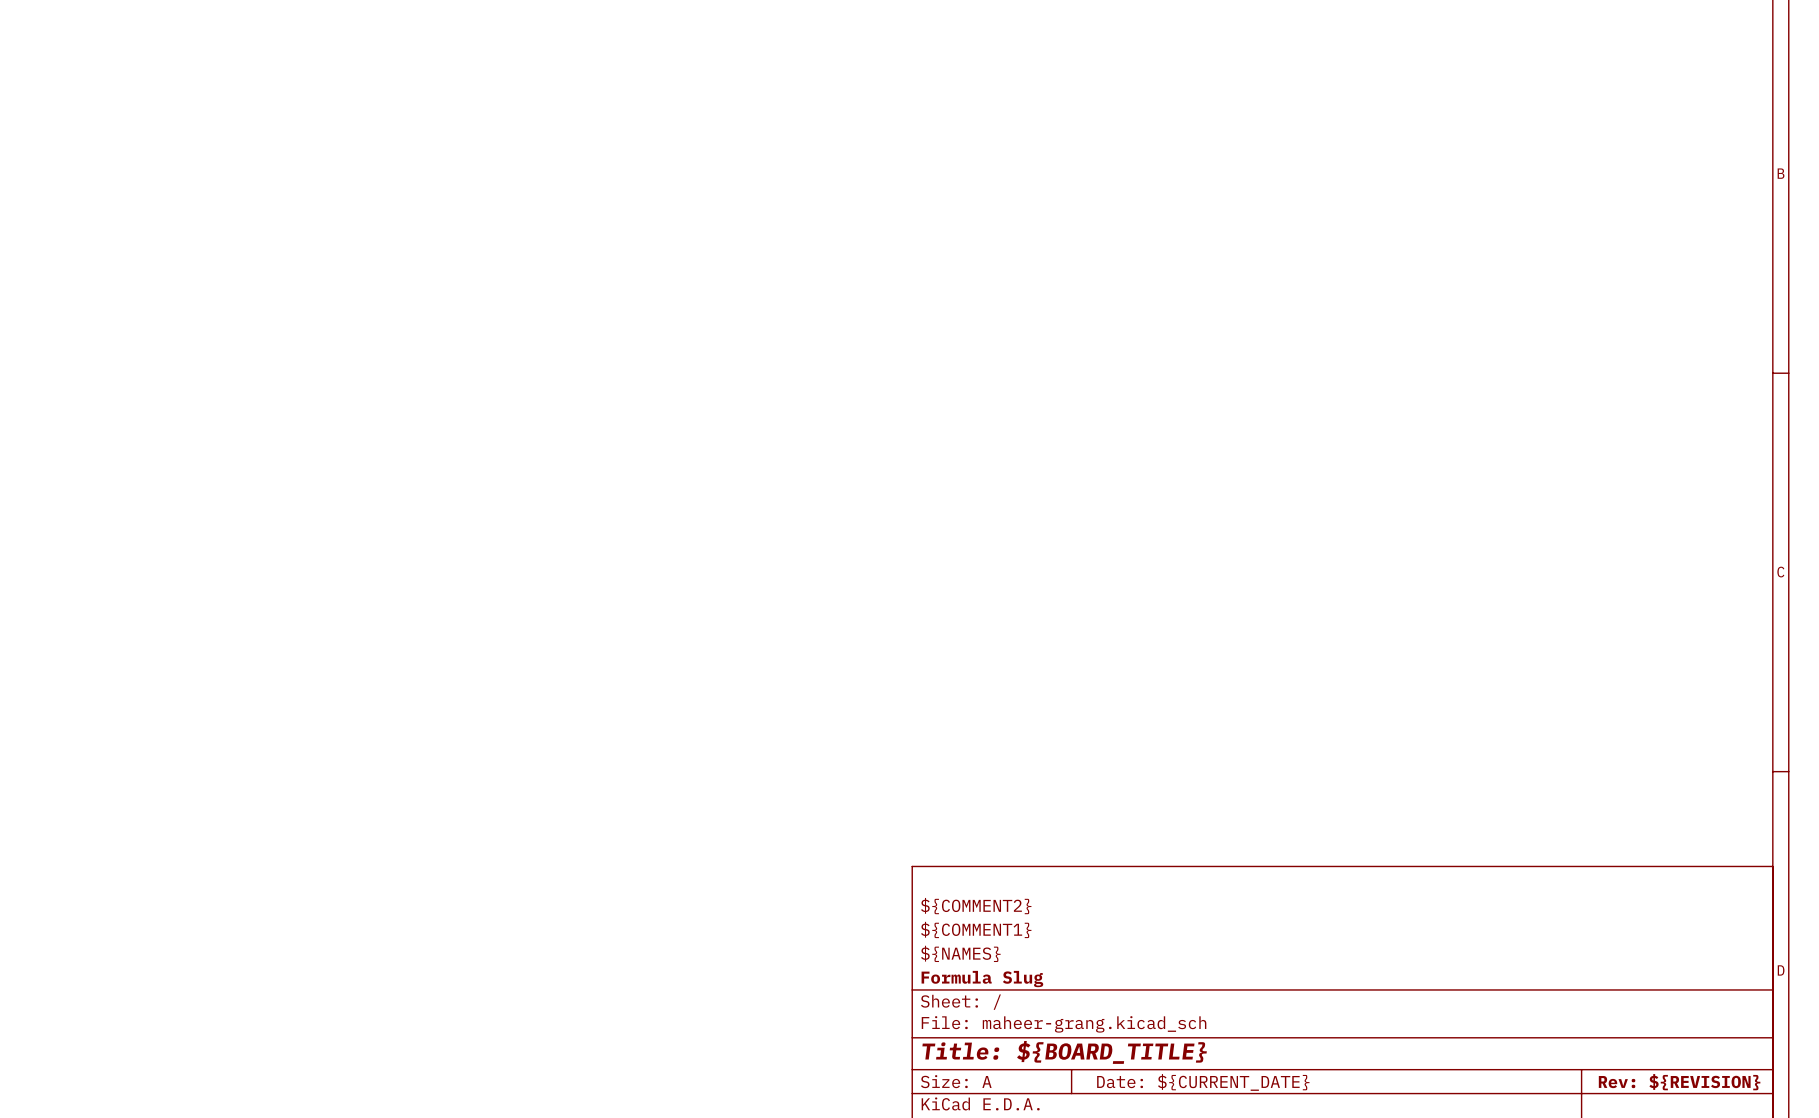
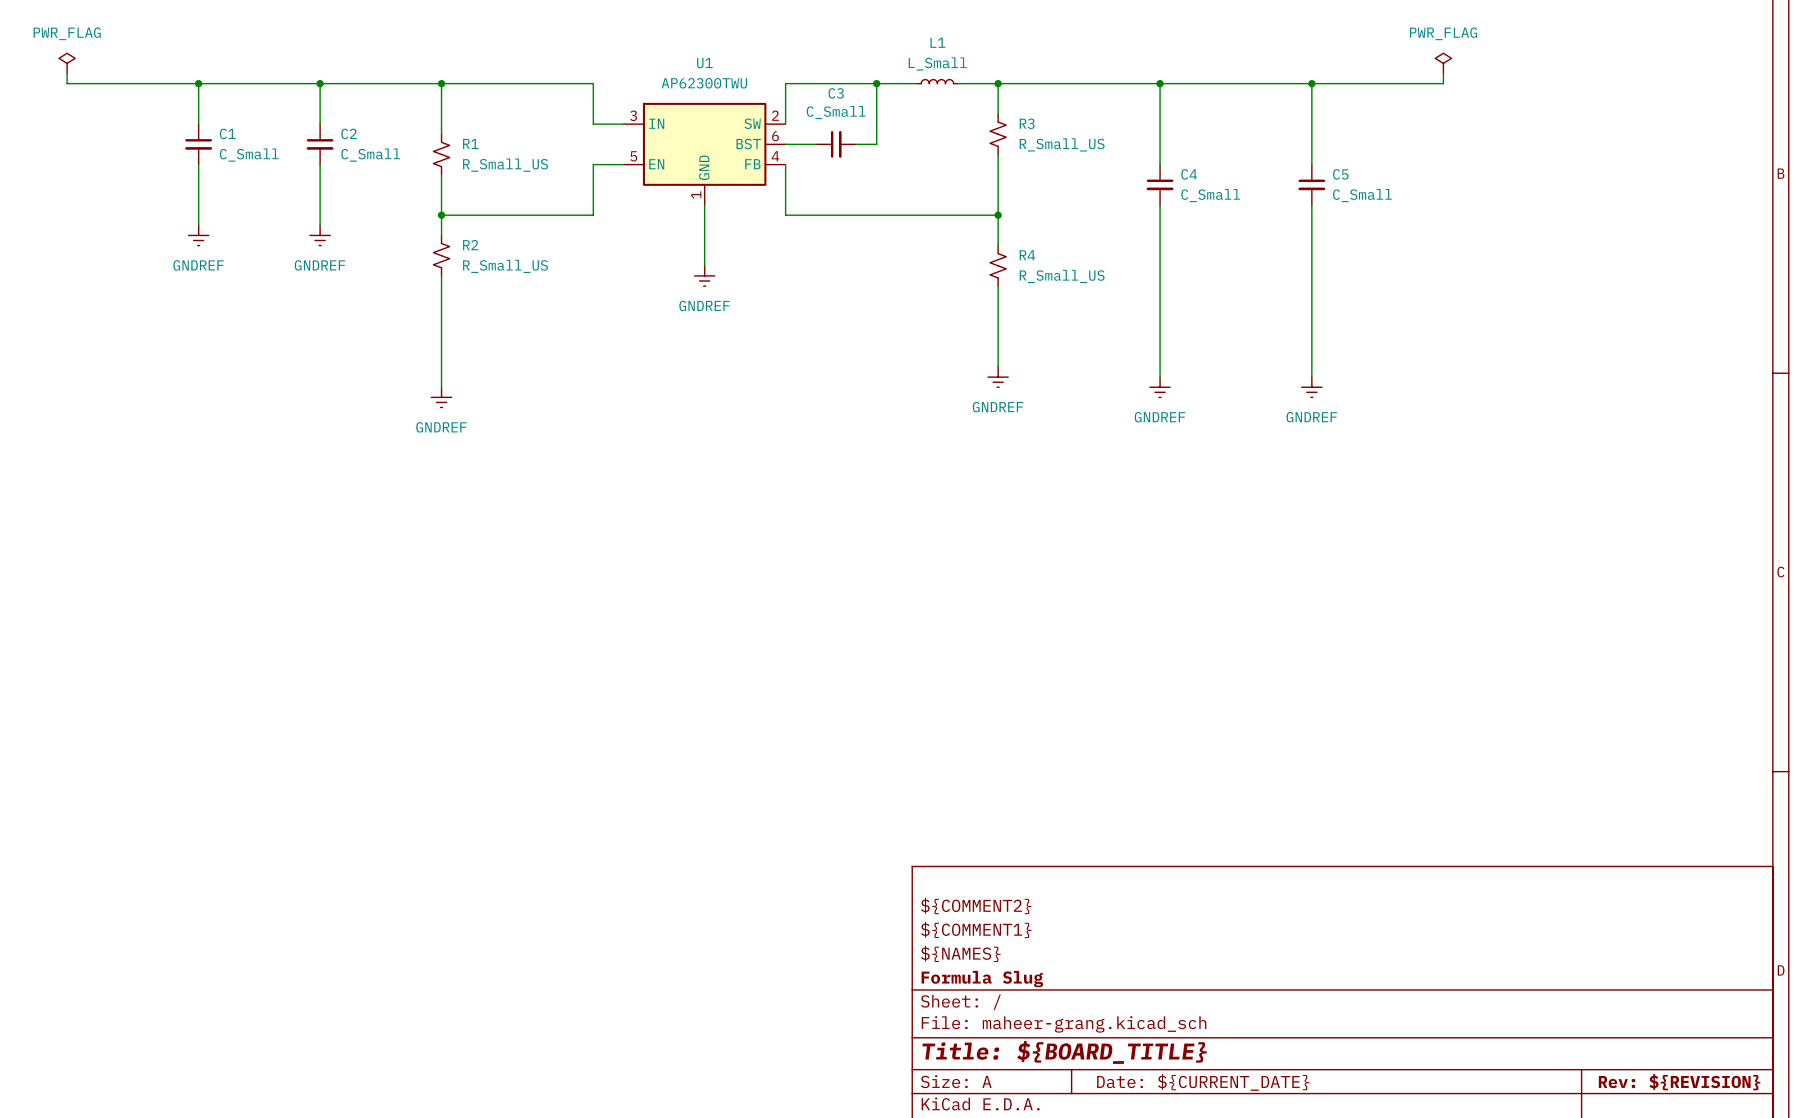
power symbol: none -> PWR_FLAG (67, 63)
power symbol: none -> PWR_FLAG (1443, 63)
wire: none -> (67, 73) (67, 83) (593, 83) (593, 124) (623, 124)
wire: none -> (1443, 73) (1443, 83) (957, 83)
L1: none -> L_Small (937, 81)
wire: none -> (198, 83) (198, 124)
junction: none -> (198, 83)
wire: none -> (320, 83) (320, 124)
junction: none -> (320, 83)
wire: none -> (441, 83) (441, 134)
junction: none -> (441, 83)
wire: none -> (876, 83) (876, 144) (856, 144)
junction: none -> (876, 83)
wire: none -> (917, 83) (785, 83) (785, 124)
wire: none -> (998, 83) (998, 114)
junction: none -> (998, 83)
wire: none -> (1160, 83) (1160, 164)
junction: none -> (1160, 83)
wire: none -> (1311, 83) (1311, 164)
junction: none -> (1311, 83)
R3: none -> R_Small_US (998, 134)
C1: none -> C_Small (198, 144)
C2: none -> C_Small (320, 144)
wire: none -> (785, 144) (815, 144)
C3: none -> C_Small (836, 144)
U1: none -> AP62300TWU (704, 153)
R1: none -> R_Small_US (441, 154)
wire: none -> (998, 154) (998, 245)
wire: none -> (198, 164) (198, 225)
wire: none -> (320, 164) (320, 225)
wire: none -> (623, 164) (593, 164) (593, 215) (441, 215)
wire: none -> (785, 164) (785, 215) (998, 215)
wire: none -> (441, 174) (441, 235)
C4: none -> C_Small (1160, 184)
C5: none -> C_Small (1311, 184)
wire: none -> (704, 205) (704, 265)
wire: none -> (1160, 205) (1160, 377)
wire: none -> (1311, 205) (1311, 377)
junction: none -> (441, 215)
junction: none -> (998, 215)
power symbol: none -> GNDREF (198, 235)
power symbol: none -> GNDREF (320, 235)
R2: none -> R_Small_US (441, 255)
R4: none -> R_Small_US (998, 265)
wire: none -> (441, 275) (441, 387)
power symbol: none -> GNDREF (704, 275)
wire: none -> (998, 286) (998, 367)
power symbol: none -> GNDREF (998, 377)
power symbol: none -> GNDREF (1160, 387)
power symbol: none -> GNDREF (1311, 387)
power symbol: none -> GNDREF (441, 397)

